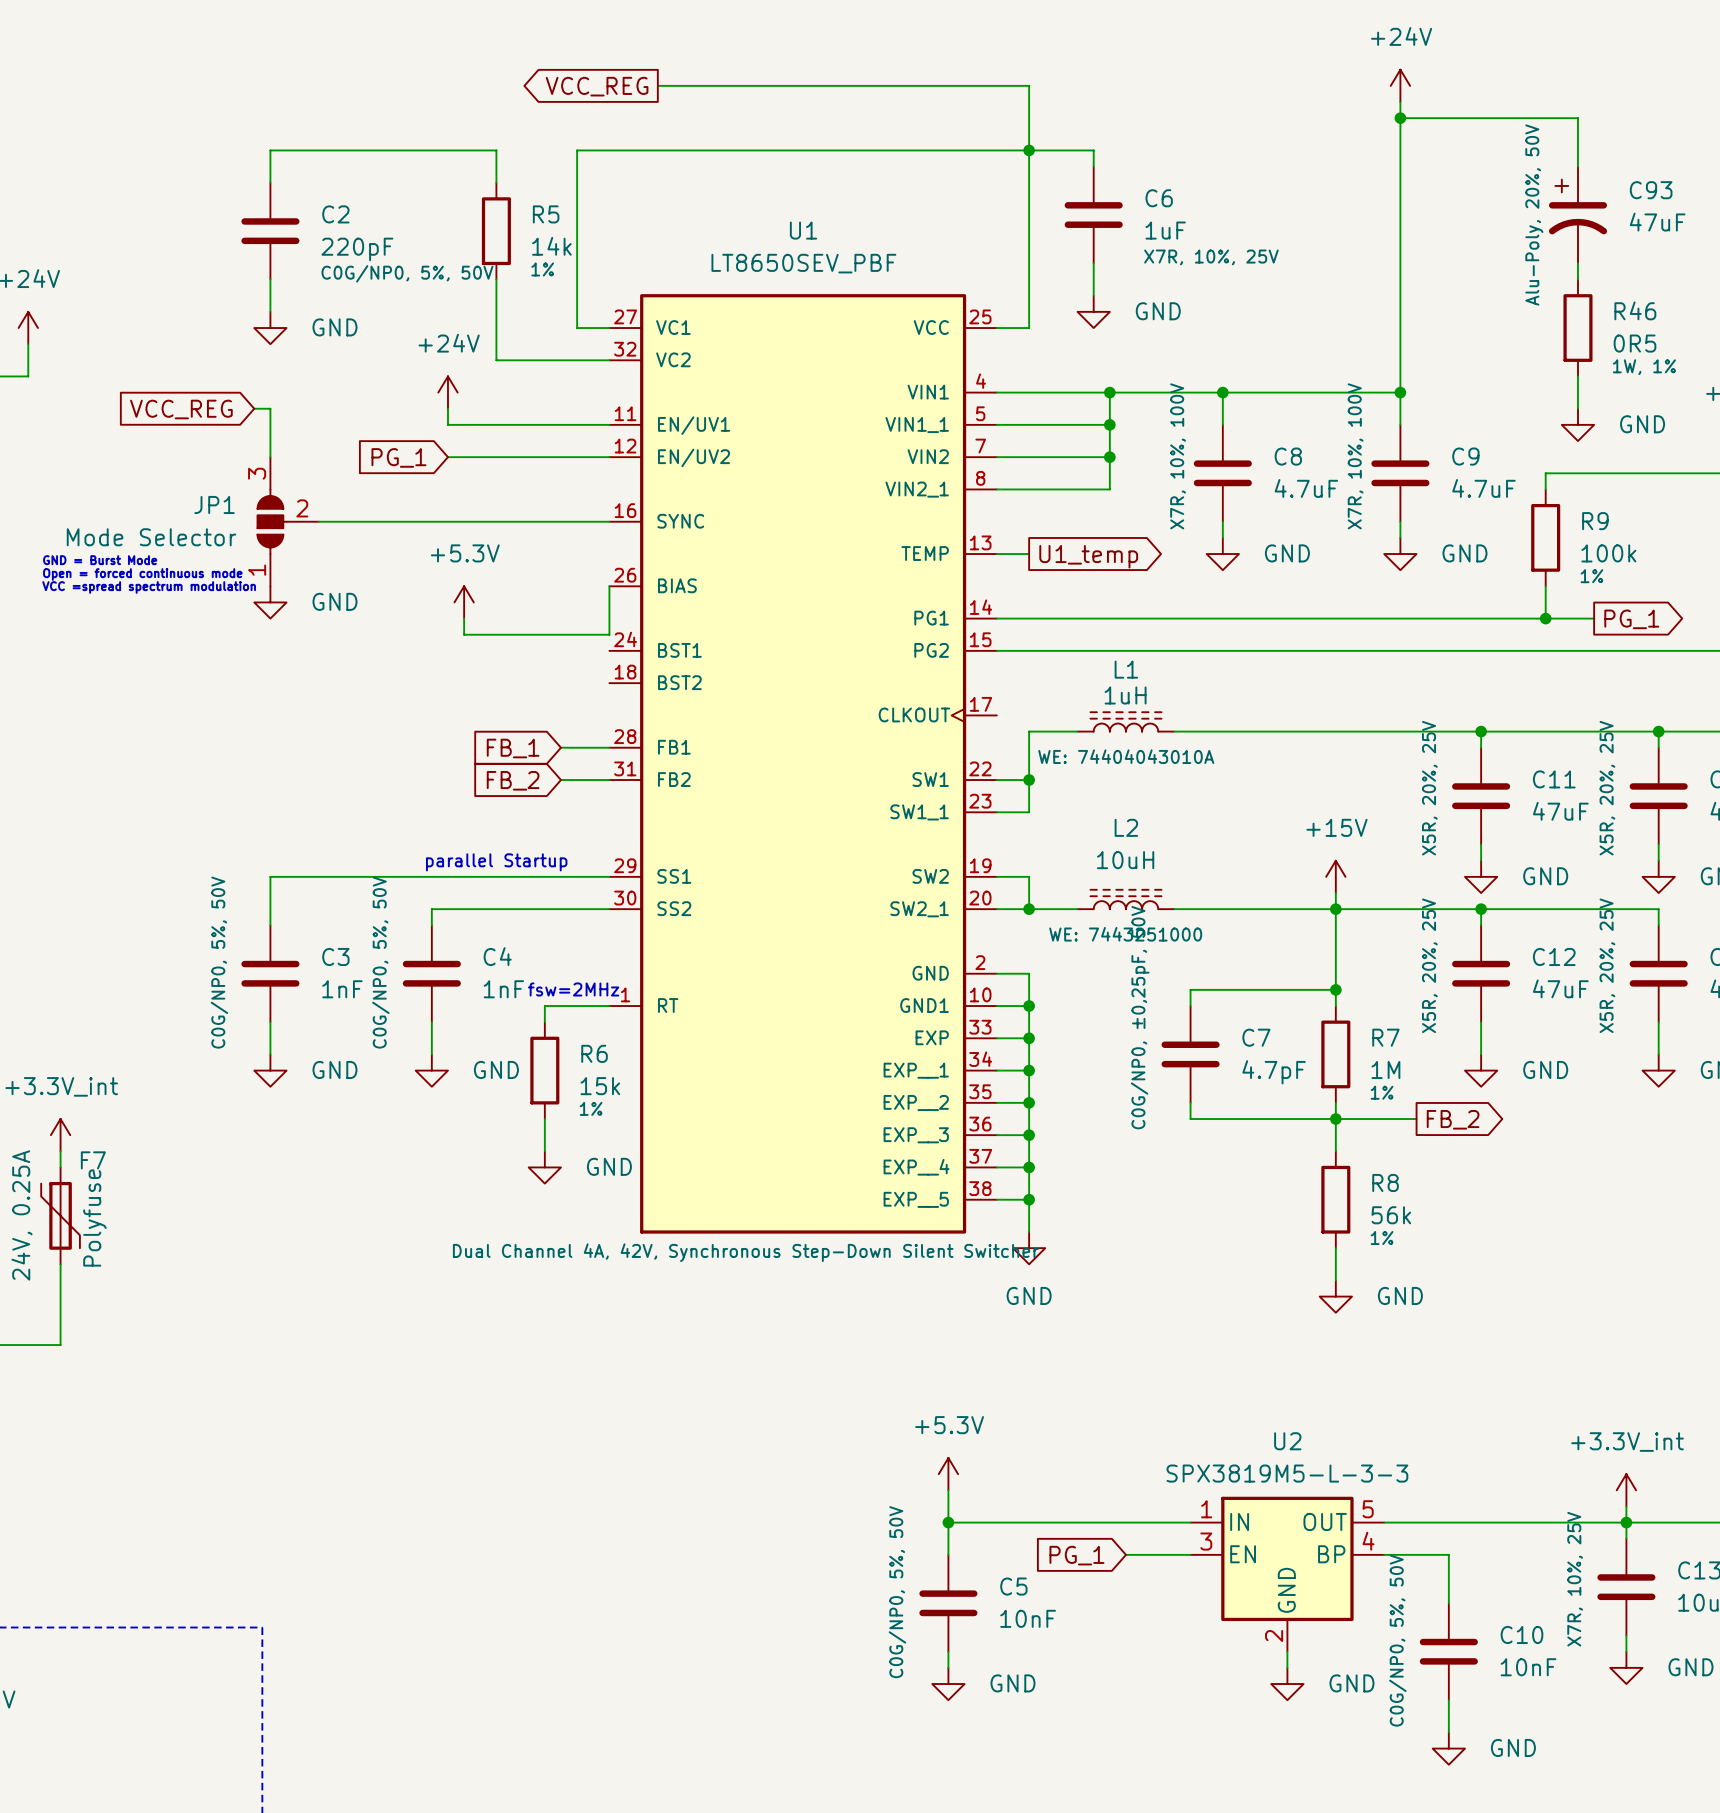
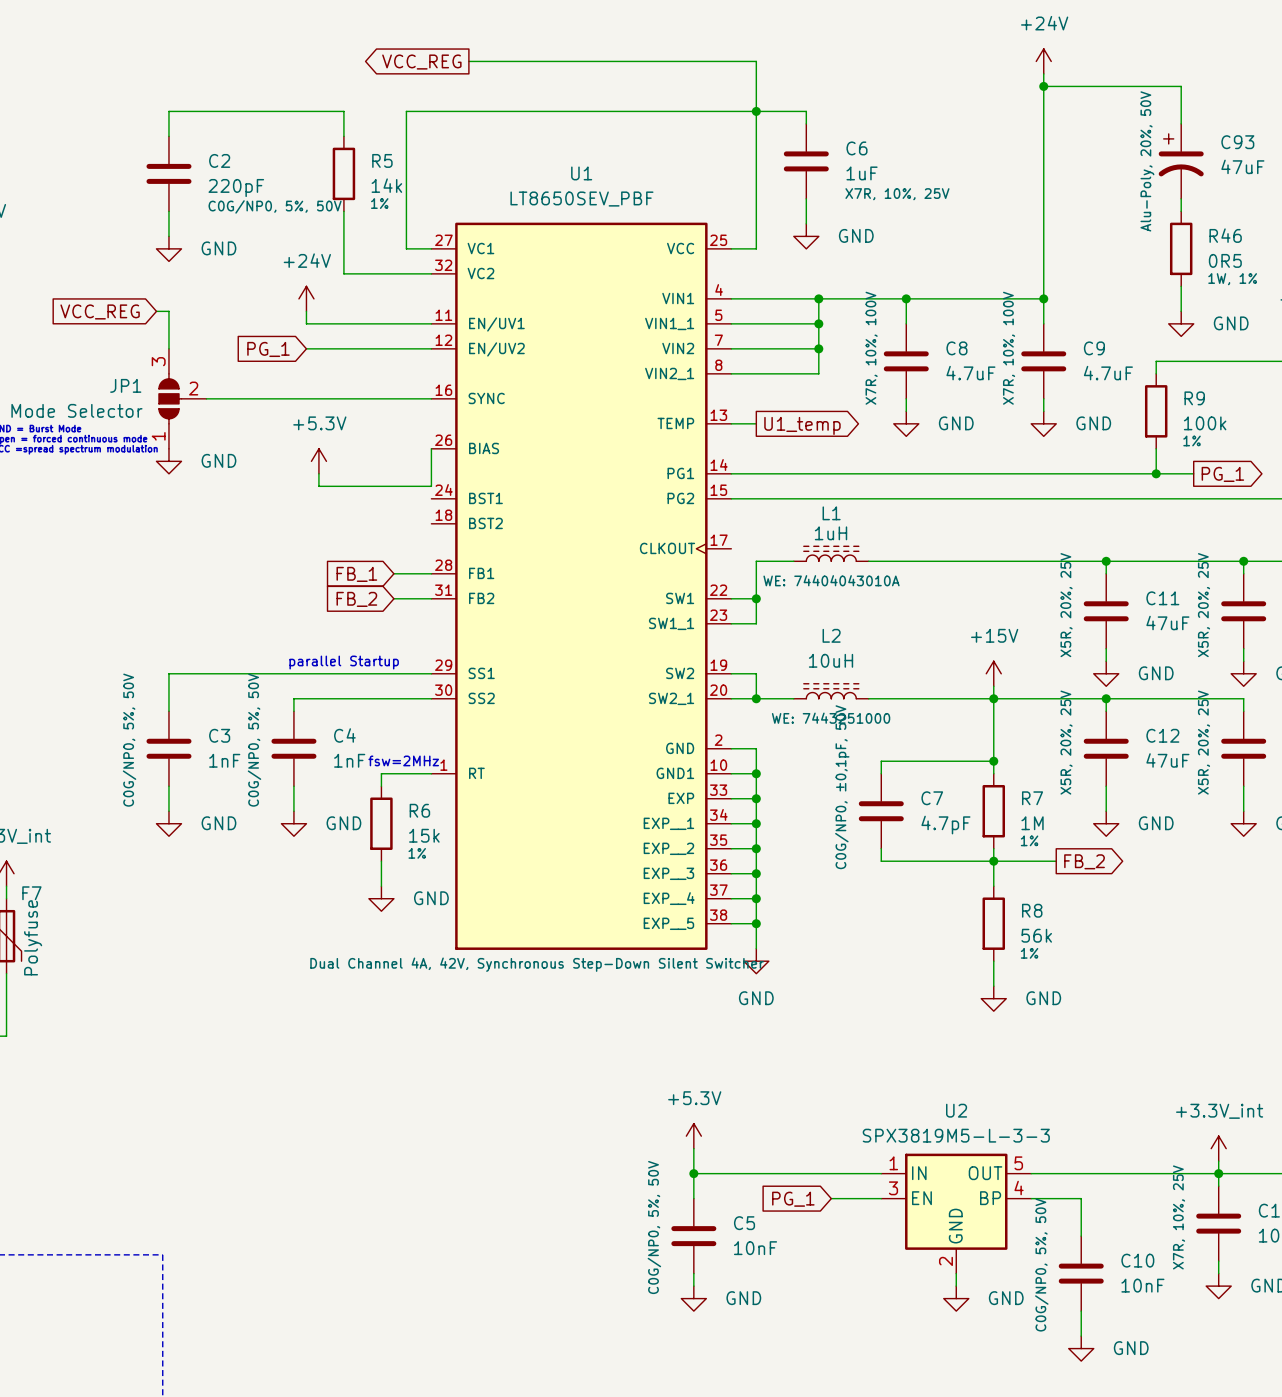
C7 text: C0G/NP0, ±0,25pF, 50V (1140, 1017) -> C0G/NP0, ±0,1pF, 50V (842, 787)

